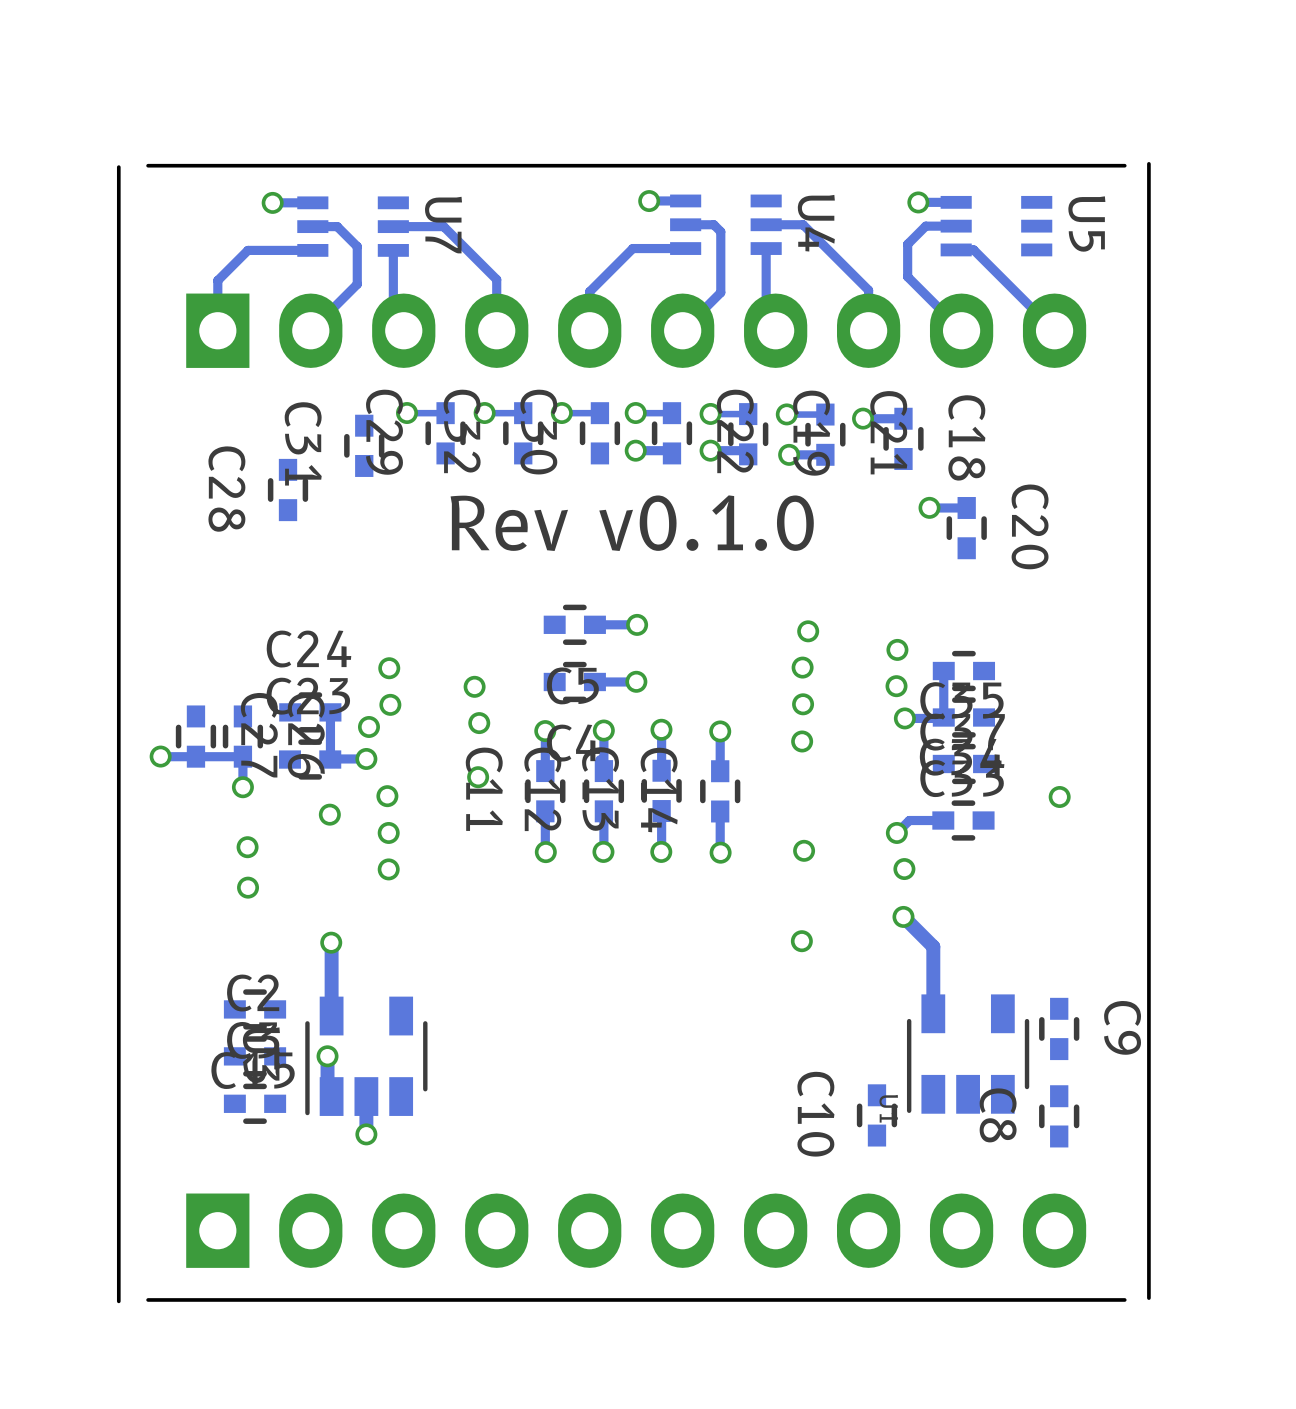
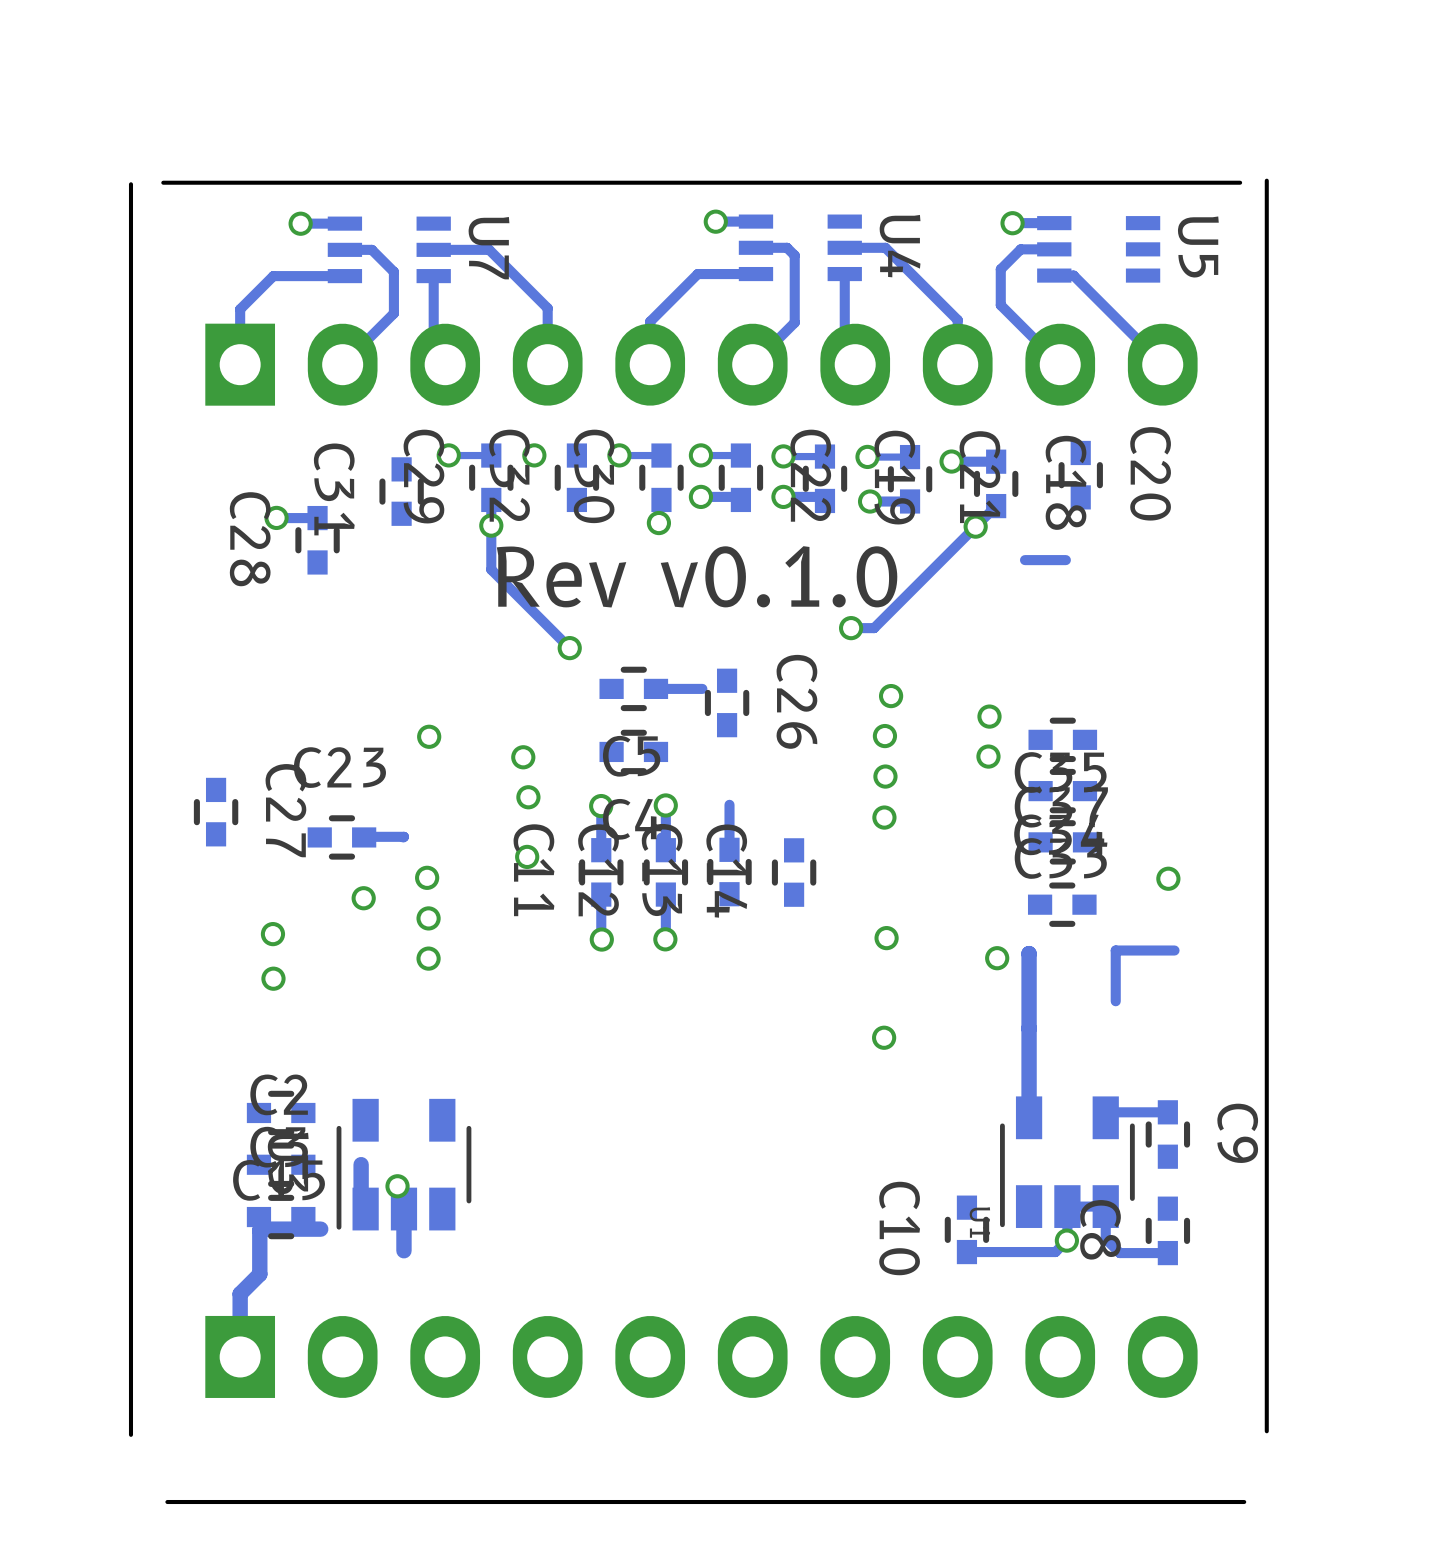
track: (523, 413) (484, 413) -> none
track: none -> (491, 499) (491, 569) (569, 648)
track: none -> (992, 502) (996, 506) (874, 628) (851, 628)
via: none -> (276, 517)
track: none -> (317, 518) (276, 518)
via: none -> (658, 523)
via: none -> (491, 525)
via position: (929, 507) -> (975, 526)
C20 position: (966, 528) -> (1080, 475)
via: none -> (851, 628)
via: none -> (569, 648)
via: (637, 624) -> none
track: (943, 671) (943, 717) (904, 718) -> none
track: (636, 681) (602, 681) -> none
via: (636, 681) -> none
via: (390, 704) -> none
C24: (310, 712) -> none
track: (330, 712) (330, 758) -> none
via: (904, 718) -> none
via: (368, 726) -> none
via: (661, 729) -> none
track: (720, 731) (720, 763) -> none
via: (720, 731) -> none
C26 position: (242, 736) -> (727, 702)
track: (160, 756) (242, 756) (242, 787) -> none
via: (160, 756) -> none
via: (366, 758) -> none
via: (242, 787) -> none
track: (661, 818) (661, 851) -> none
track: (720, 818) (720, 852) -> none
track: (935, 820) (909, 820) (896, 832) -> none
via: (896, 832) -> none
via: (661, 851) -> none
via: (720, 852) -> none
track: none -> (1174, 950) (1115, 950) (1115, 1001)
track: (903, 916) (933, 946) -> (1029, 953) (1029, 1043)
via: (903, 916) -> none
via: (331, 942) -> none
track: (331, 943) (331, 1016) -> none
track: none -> (1167, 1112) (1111, 1112) (1105, 1117)
via: (327, 1056) -> none
via: none -> (397, 1186)
track: none -> (320, 1229) (259, 1230) (259, 1274) (240, 1293) (240, 1356)
via: none -> (1066, 1240)
via: (366, 1134) -> none
track: none -> (966, 1252) (1055, 1252) (1067, 1240) (1067, 1206) (1105, 1206) (1105, 1238) (1119, 1253) (1167, 1253)
board edge: (1124, 1299) (148, 1299) -> (1244, 1502) (167, 1502)

